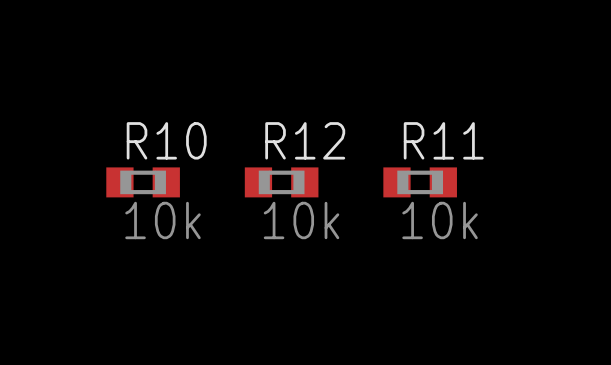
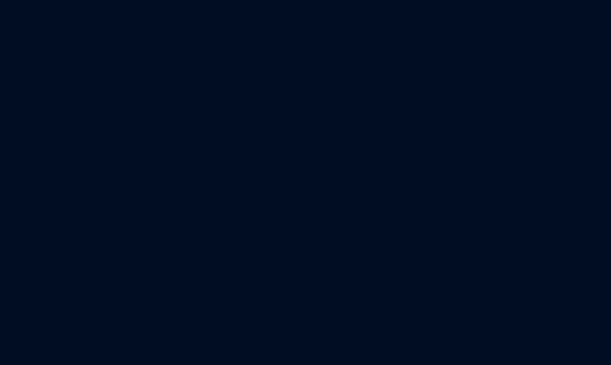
R10: 10k (143, 182) -> none
R12: 10k (281, 182) -> none
R11: 10k (420, 182) -> none

